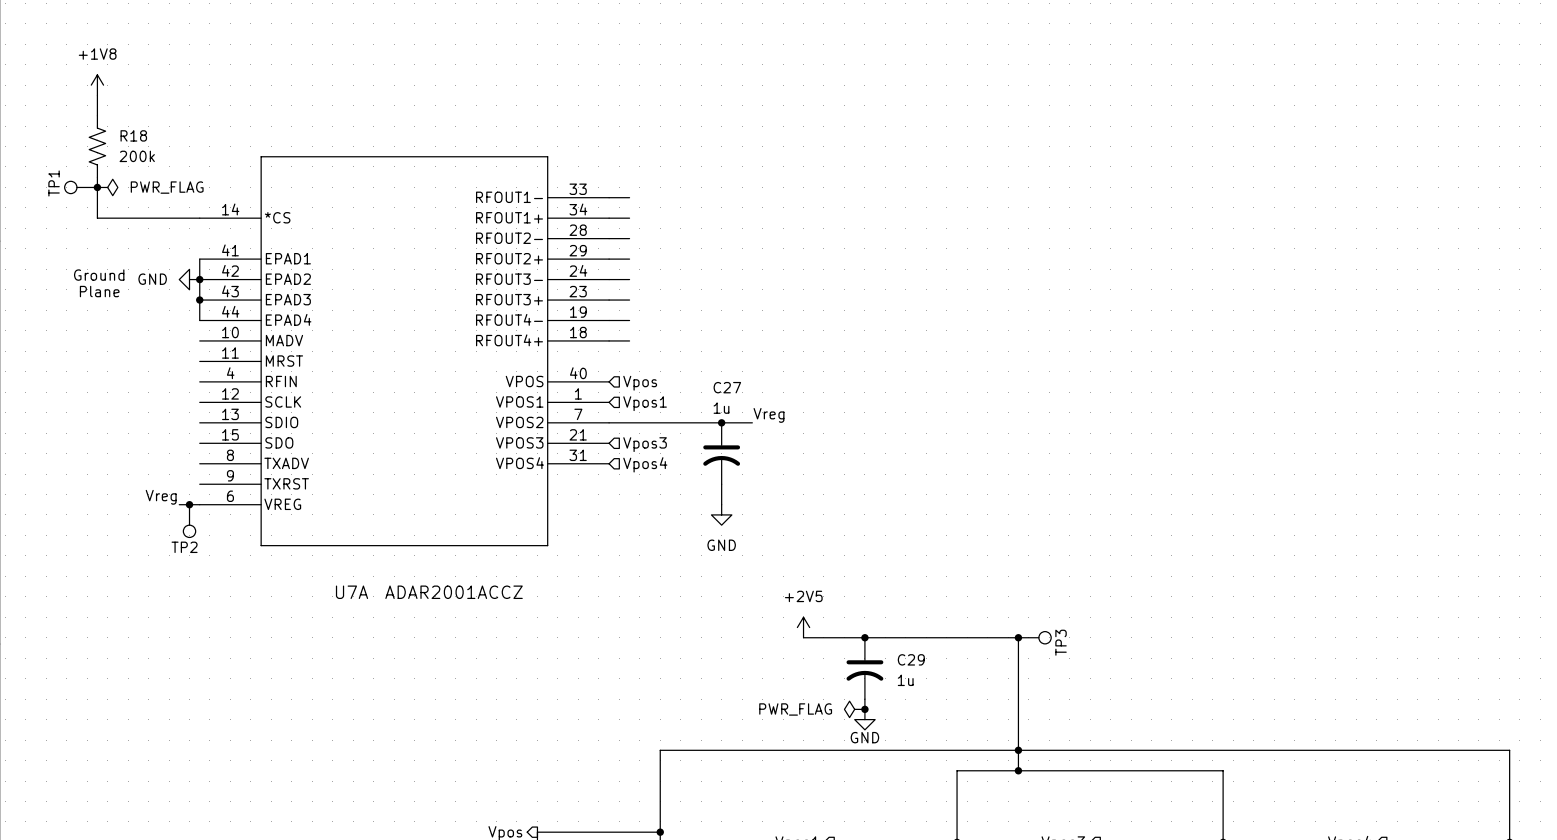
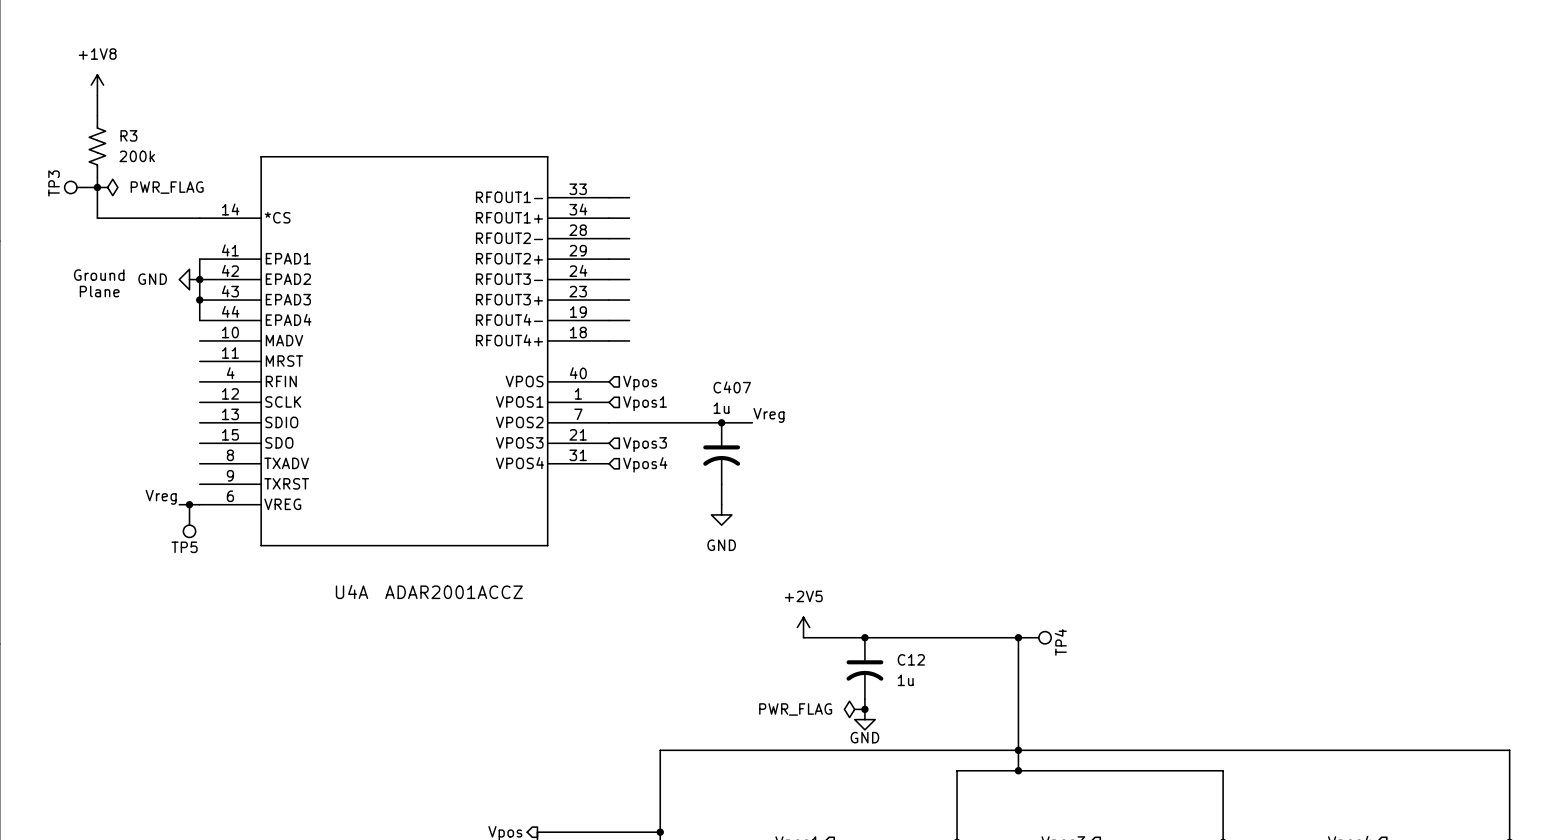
R18 name: R18 (133, 135) -> R3 (128, 135)
TP1 name: TP1 (54, 183) -> TP3 (54, 183)
C27 name: C27 (727, 387) -> C407 (732, 387)
TP2 name: TP2 (184, 547) -> TP5 (184, 547)
U7A name: U7A (352, 592) -> U4A (352, 591)
TP3 name: TP3 (1061, 642) -> TP4 (1060, 642)
C29 name: C29 (911, 659) -> C12 (911, 659)

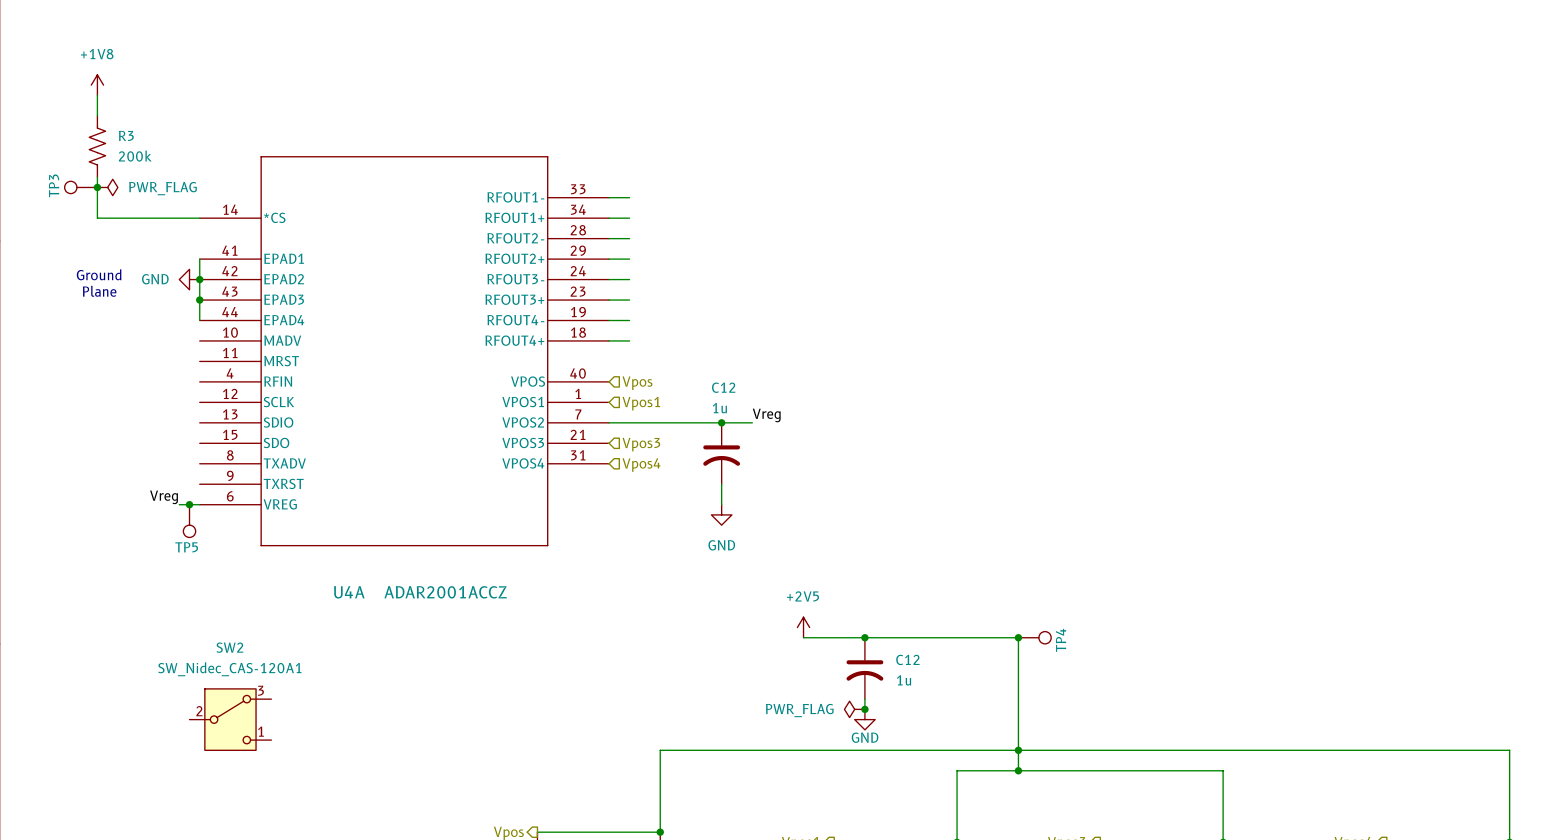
C407 name: C407 (732, 387) -> C12 (723, 387)
SW2: none -> SW_Nidec_CAS-120A1 (230, 719)

